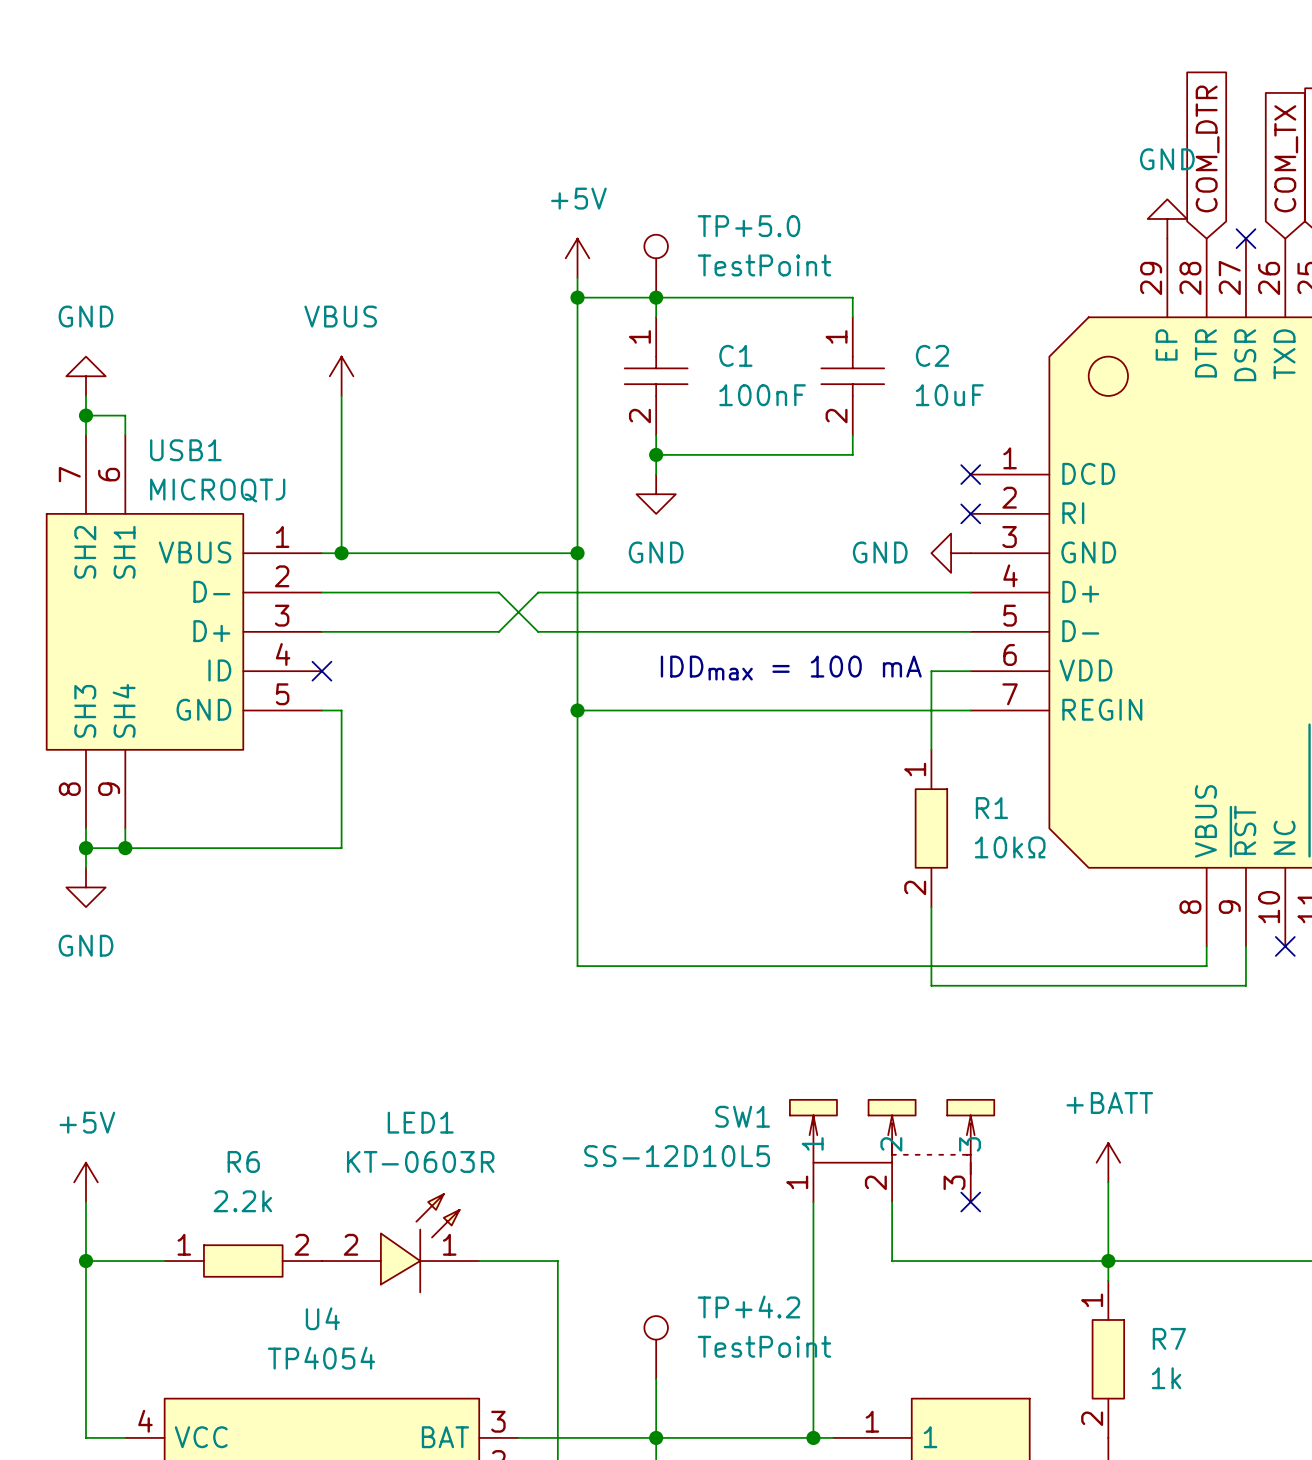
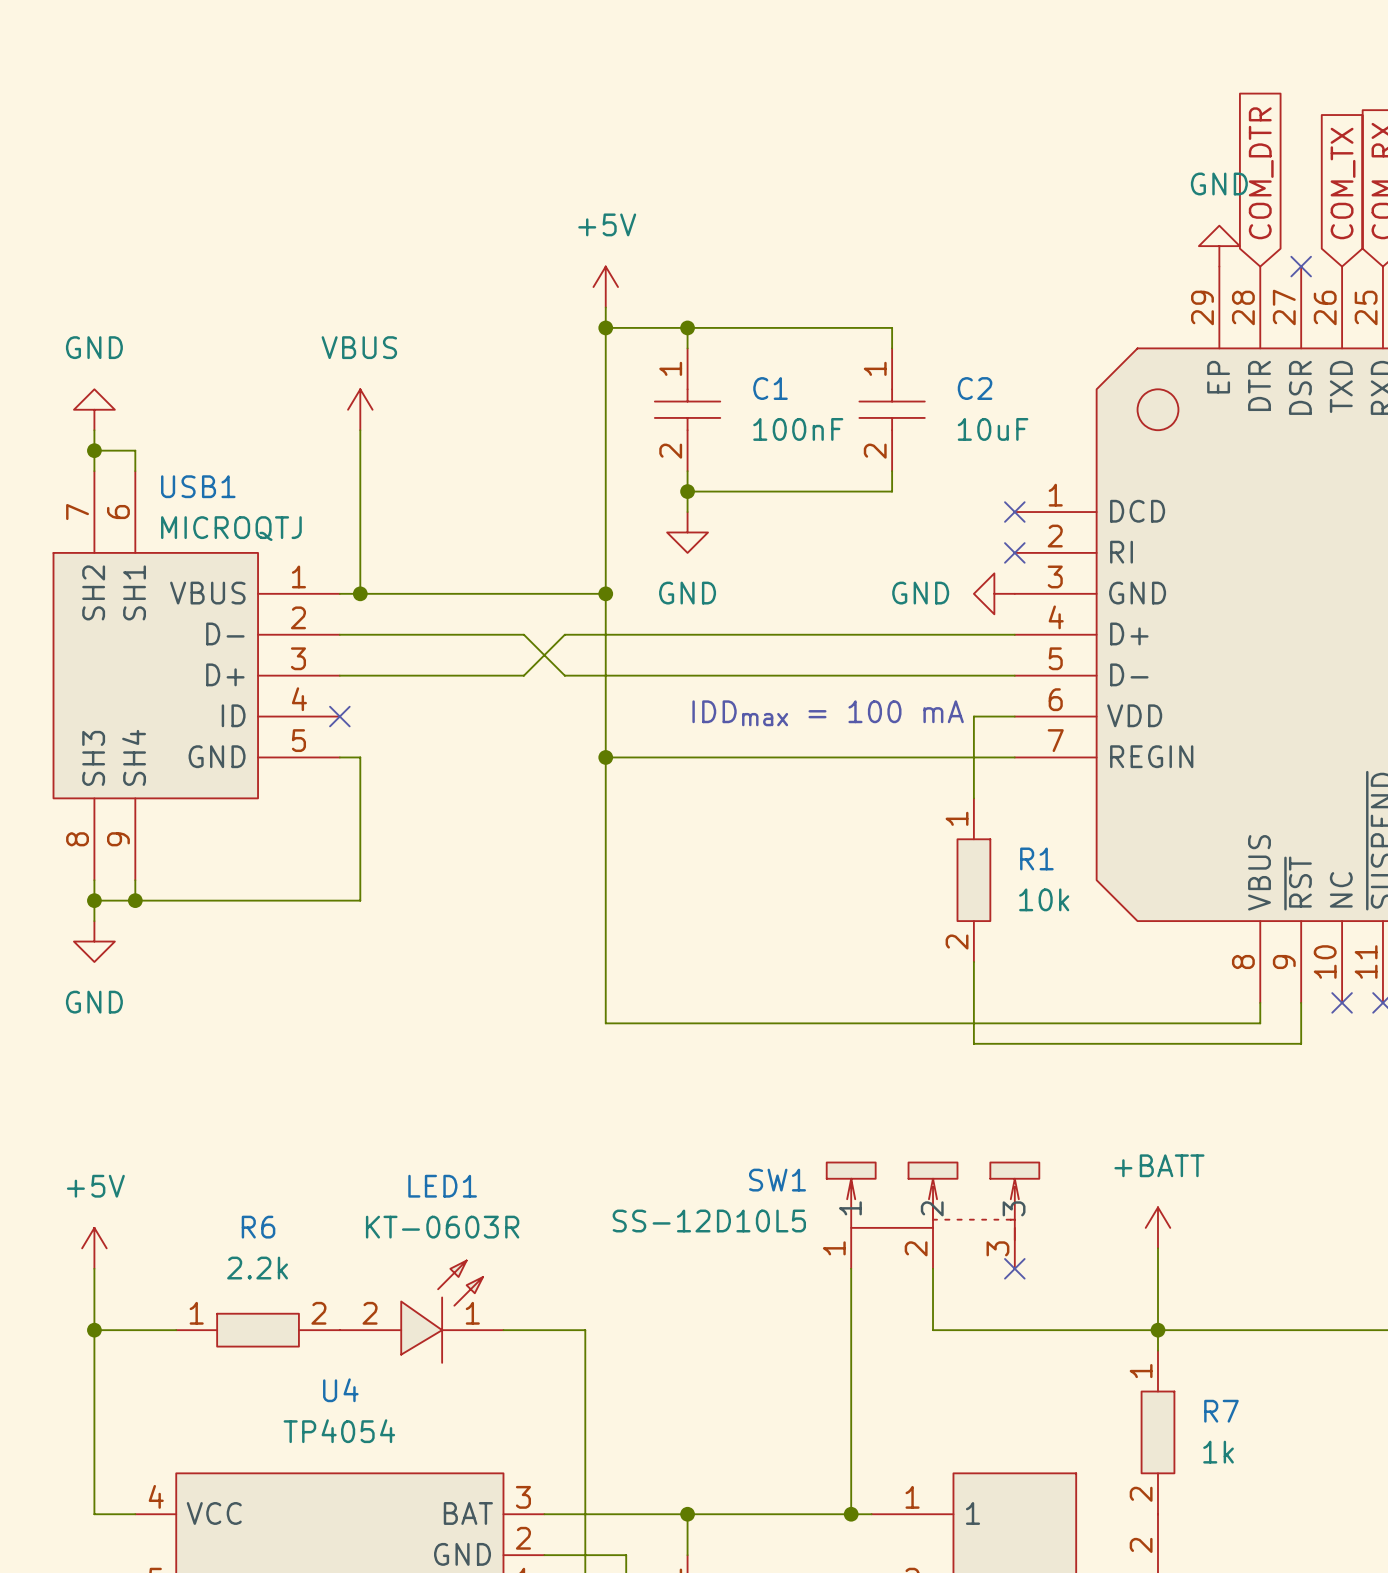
TP+5.0: TestPoint (656, 266) -> none
R1 value: 10kΩ (1010, 847) -> 10k (1044, 899)
TP+4.2: TestPoint (656, 1347) -> none
wire: (656, 1378) (656, 1437) -> none

